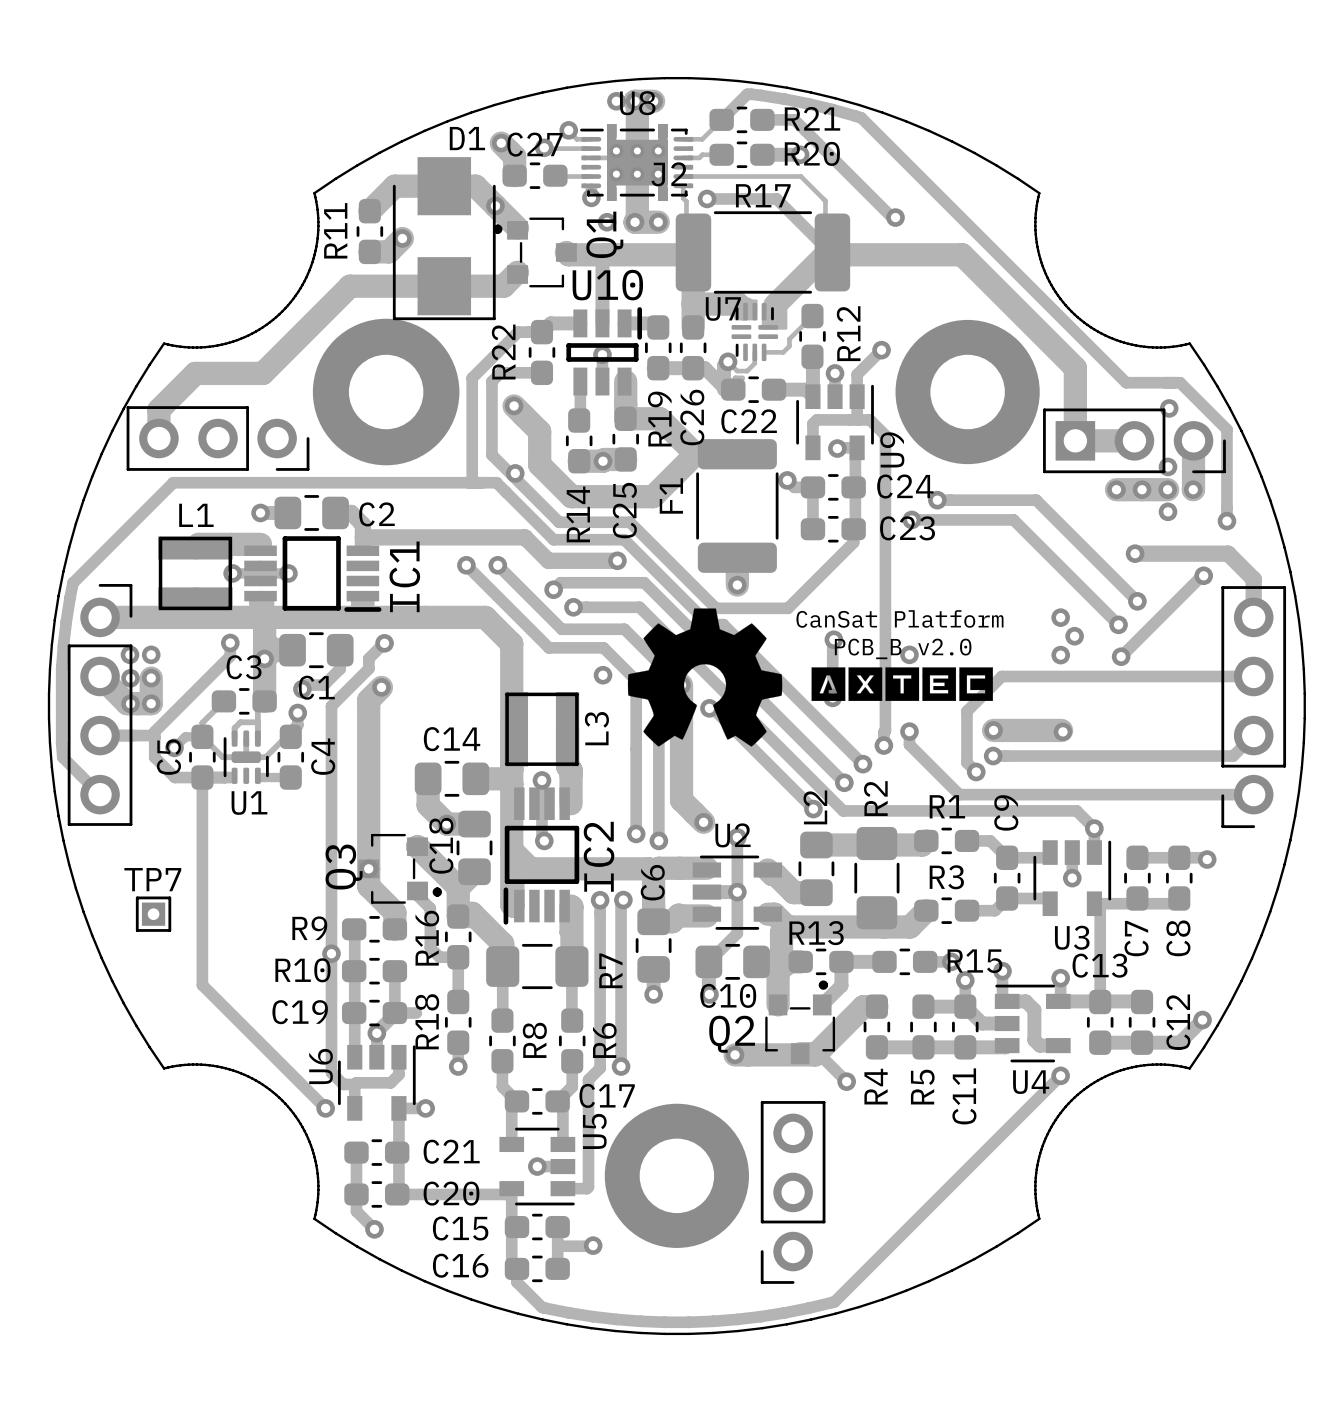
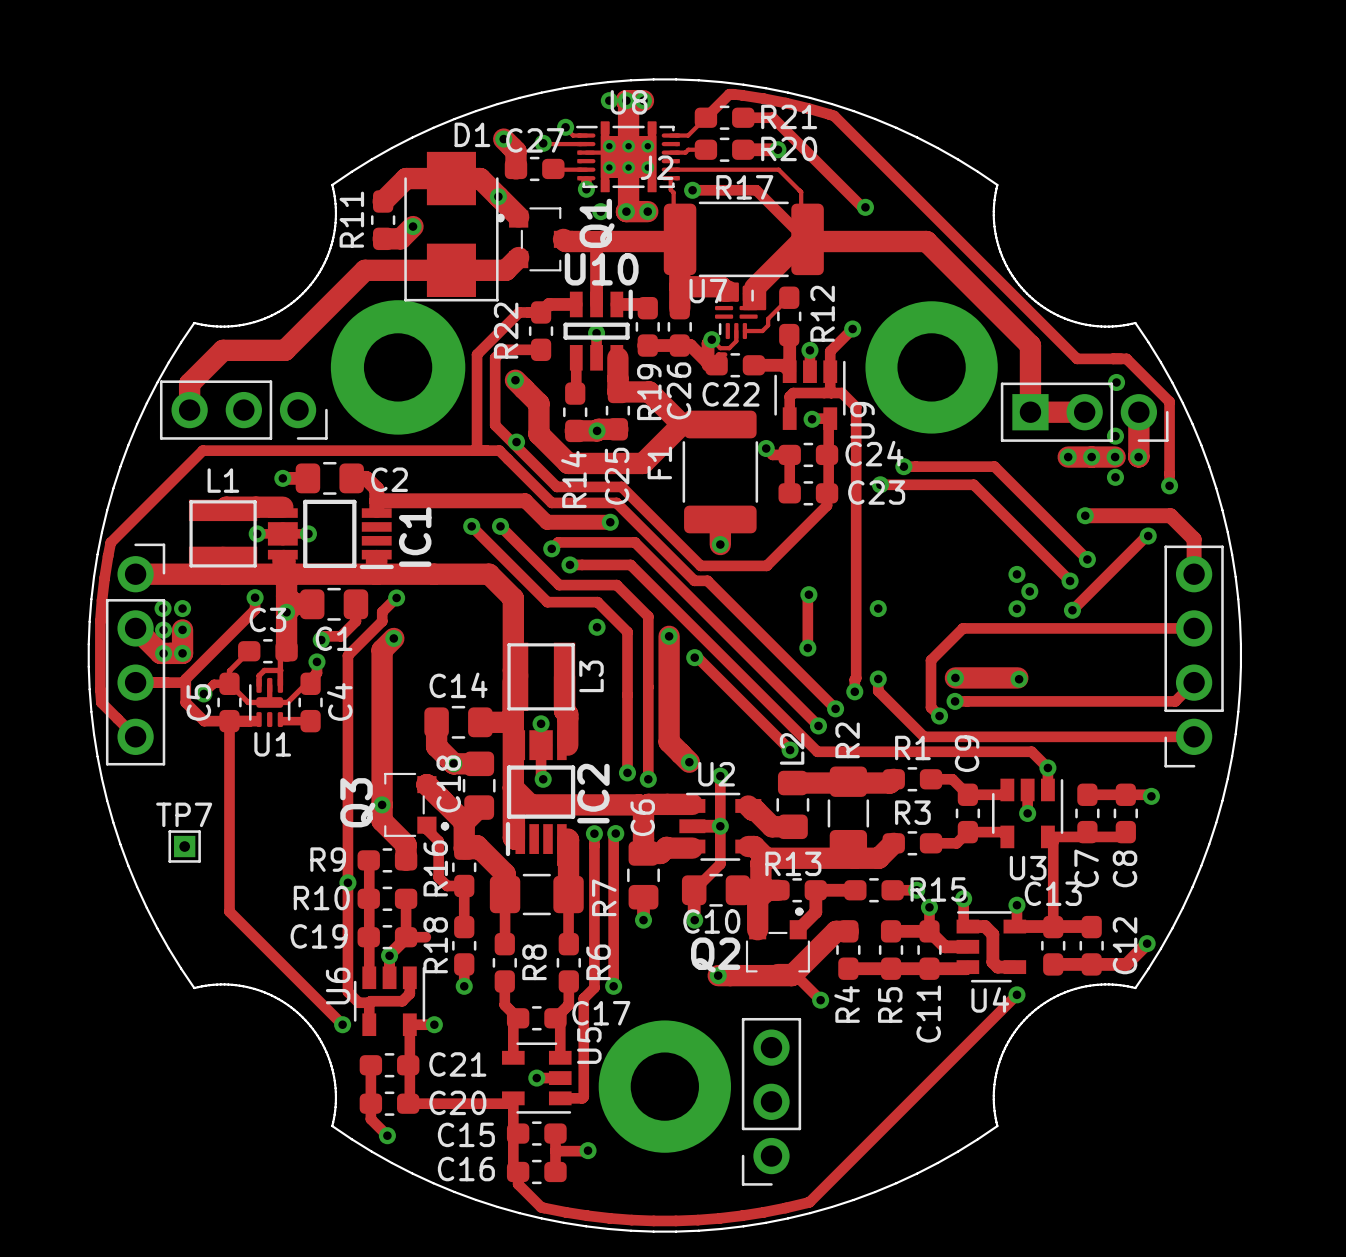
drawing: [627, 608, 783, 747] -> none
text: CanSat Platform (899, 618) -> none
text: PCB_B v2.0 (903, 648) -> none
drawing: [811, 667, 993, 701] -> none

